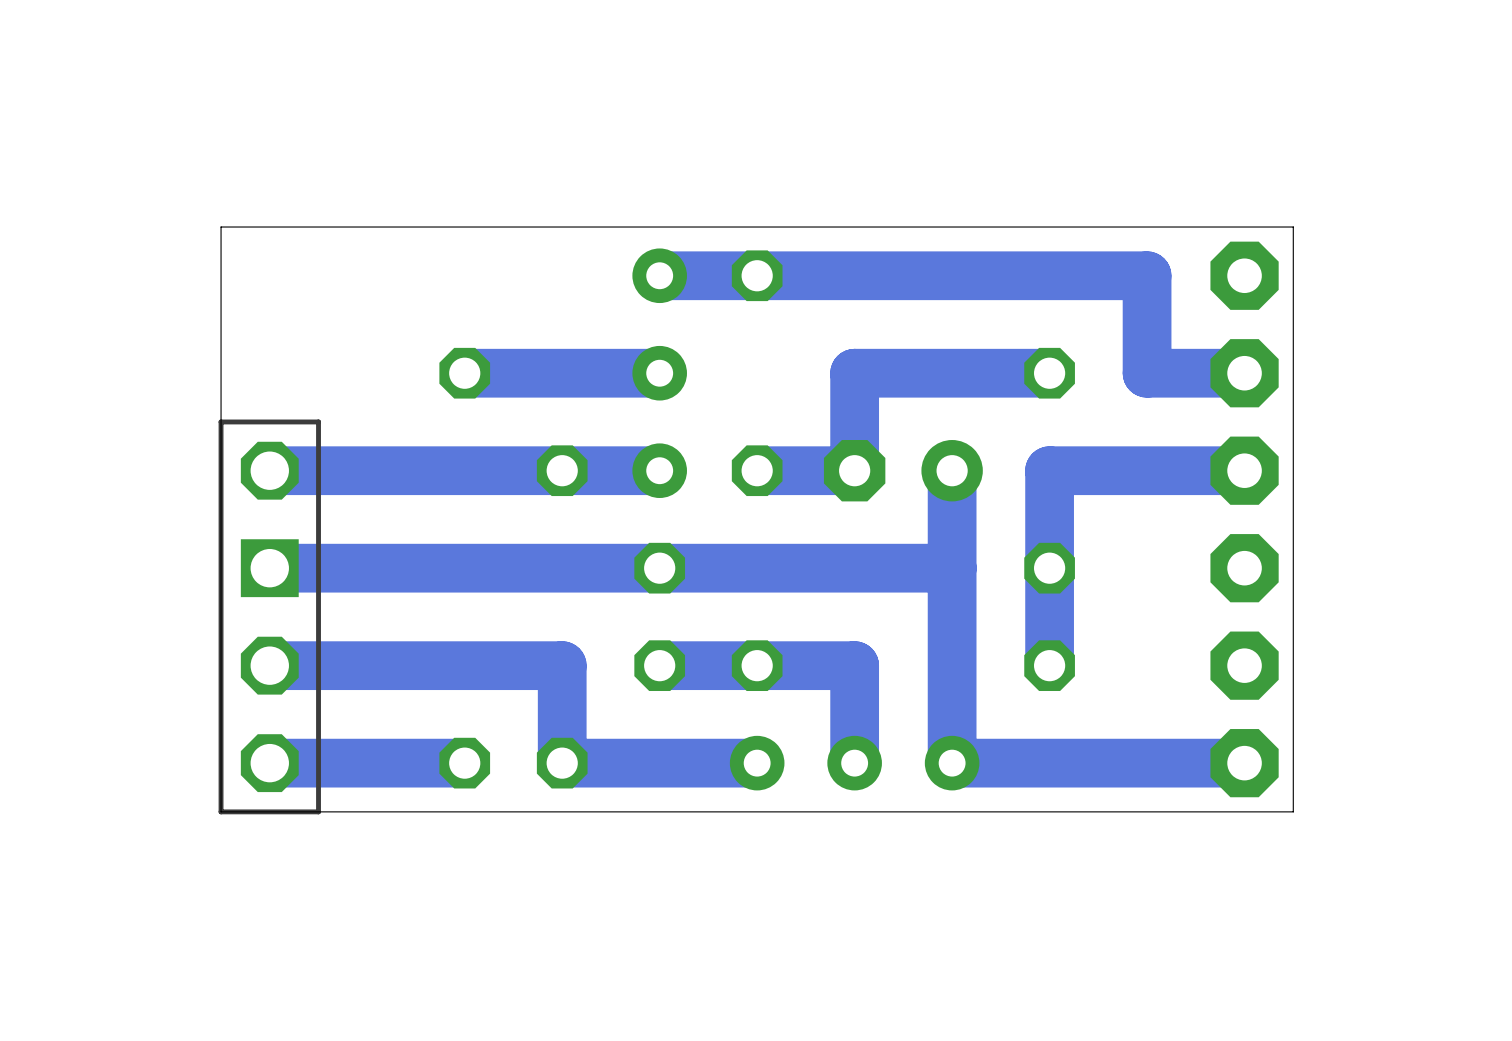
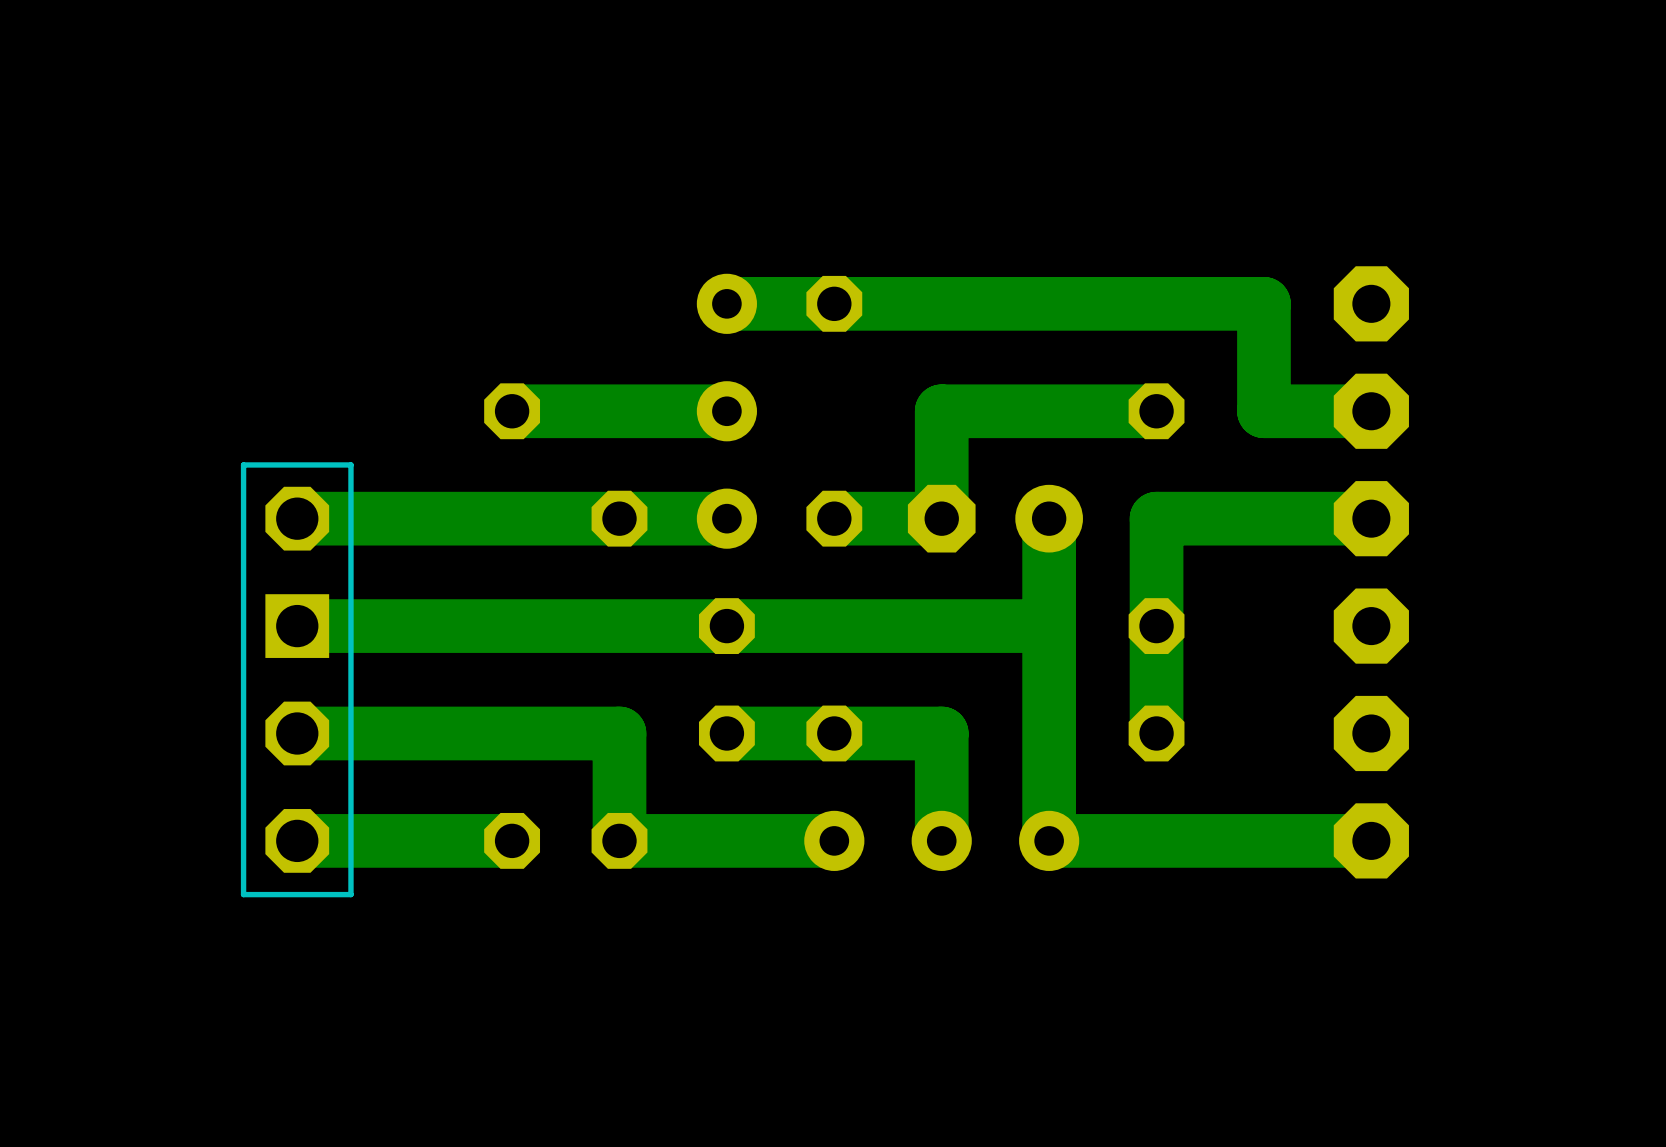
board edge: (1293, 227) (221, 227) (221, 811) (1293, 811) (1293, 227) -> none

